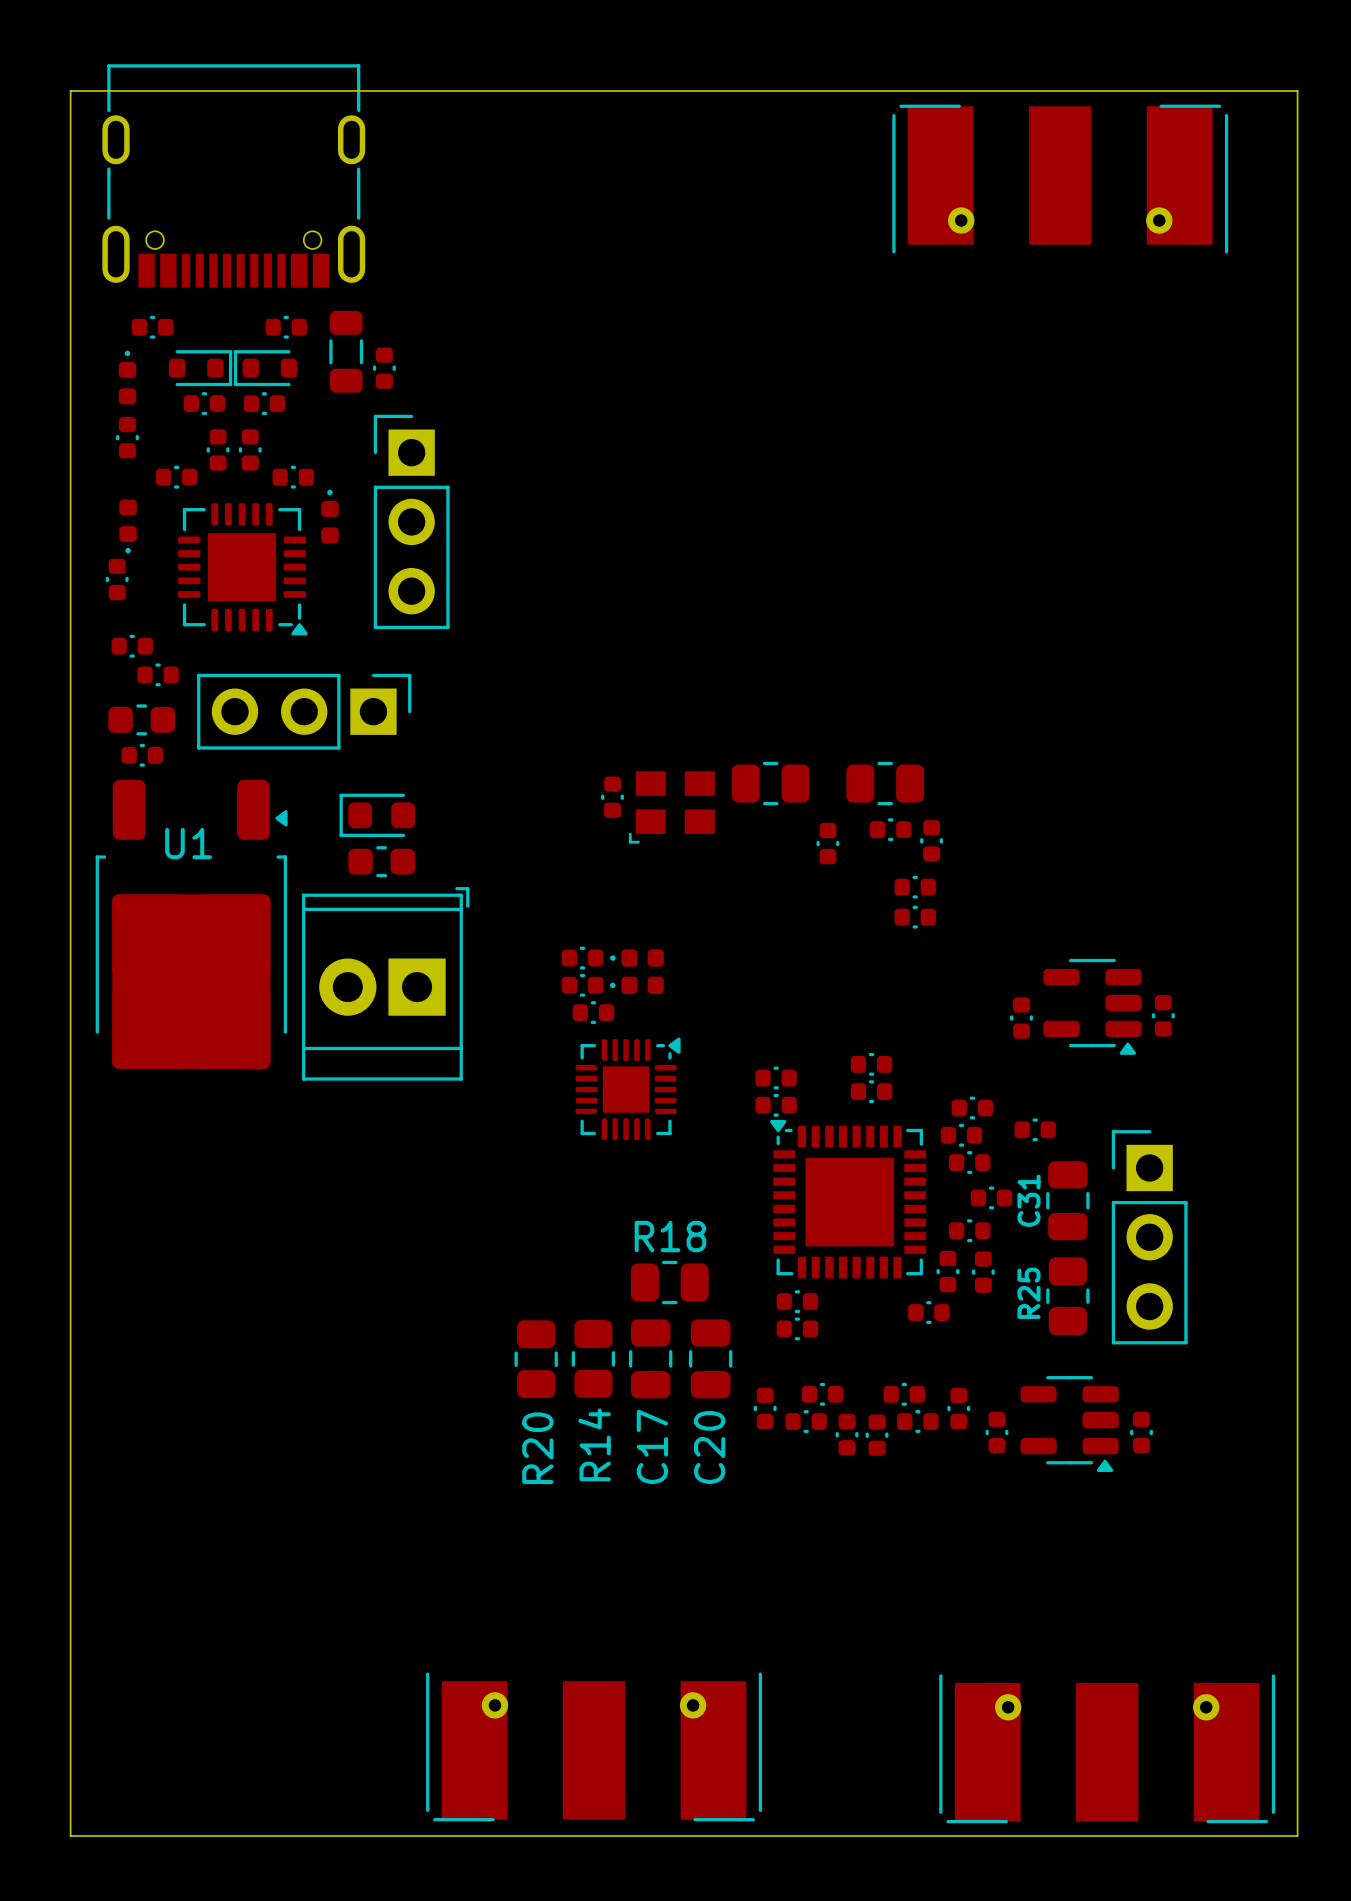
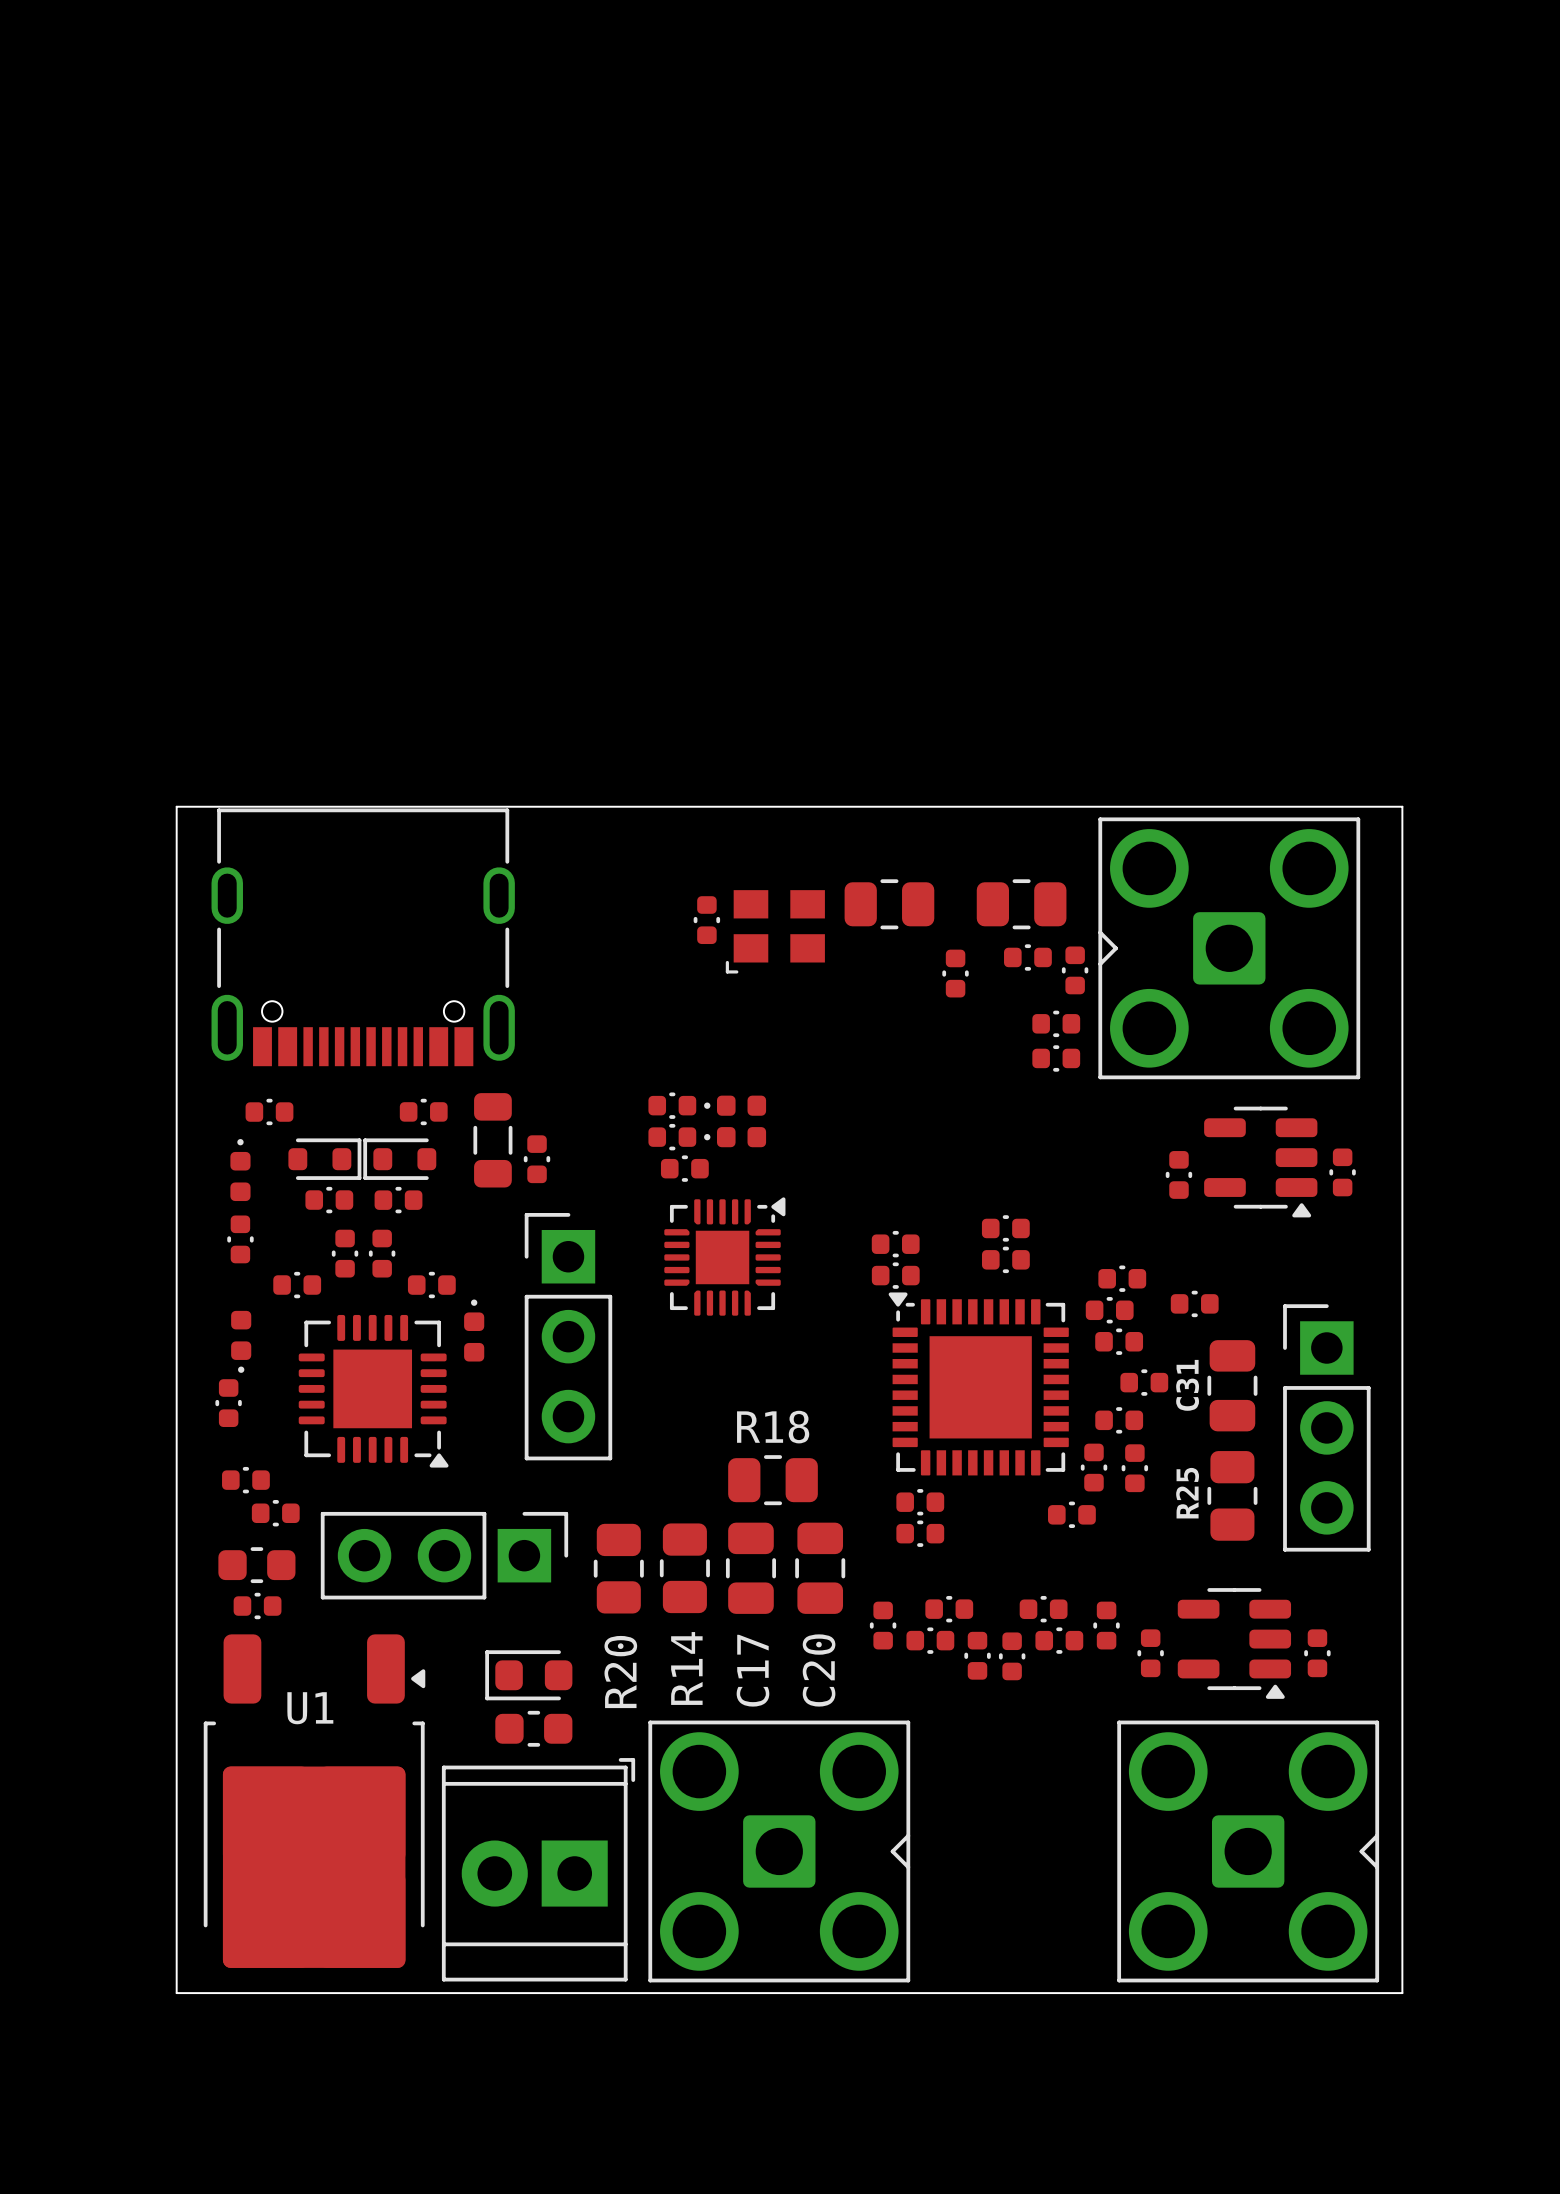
board edge: (70, 90) (1297, 90) (1297, 1836) (70, 1836) (70, 90) -> (176, 806) (176, 1993) (1402, 1993) (1402, 806) (176, 806)
part position: (233, 175) -> (363, 937)
part: (1060, 179) -> none
part: (152, 327) -> none
part: (286, 327) -> none
part position: (346, 351) -> (492, 1140)
part: (200, 368) -> none
part: (265, 368) -> none
part: (384, 368) -> none
part: (127, 377) -> none
part: (204, 403) -> none
part: (264, 403) -> none
part: (127, 437) -> none
part: (218, 449) -> none
part: (250, 449) -> none
part: (176, 477) -> none
part: (293, 477) -> none
part: (329, 516) -> none
part: (411, 521) -> none
part: (128, 526) -> none
part position: (242, 569) -> (373, 1391)
part: (117, 579) -> none
part: (132, 646) -> none
part: (158, 674) -> none
part: (304, 711) -> none
part: (141, 719) -> none
part: (142, 755) -> none
part position: (377, 815) -> (528, 1675)
part: none -> (1229, 948)
part: (381, 861) -> none
U1 position: (191, 924) -> (314, 1801)
part: none -> (269, 1111)
part: none -> (423, 1111)
part position: (385, 983) -> (538, 1869)
part: none -> (324, 1159)
part: none -> (399, 1159)
part: none -> (536, 1159)
part: none -> (240, 1170)
part: none -> (329, 1200)
part: none -> (398, 1200)
part: none -> (240, 1239)
part: none -> (345, 1253)
part: none -> (382, 1253)
part: none -> (297, 1285)
part: none -> (431, 1285)
part: none -> (474, 1330)
part: none -> (568, 1336)
part: none -> (241, 1341)
part: none -> (228, 1403)
part: none -> (245, 1480)
part: none -> (275, 1513)
part: none -> (444, 1555)
part: none -> (256, 1565)
part: none -> (257, 1605)
part: none -> (533, 1728)
part: none -> (779, 1851)
part: none -> (1248, 1851)
part: (594, 1746) -> none
part: (1107, 1748) -> none

